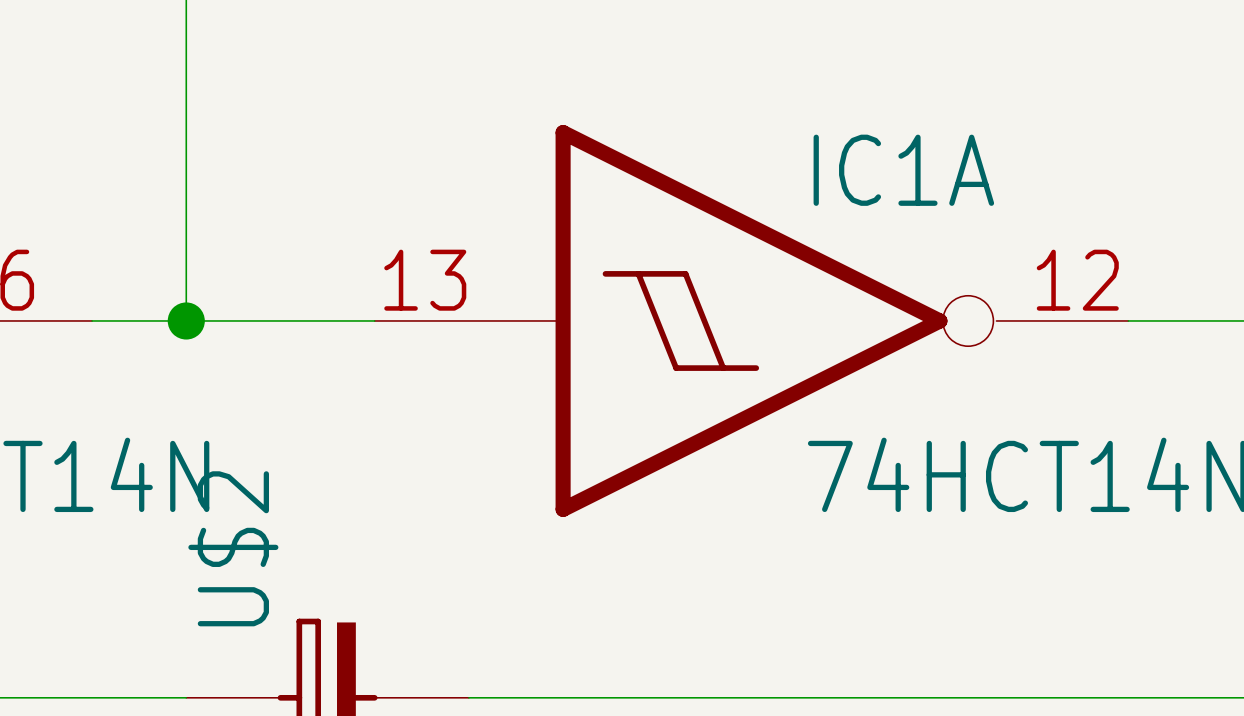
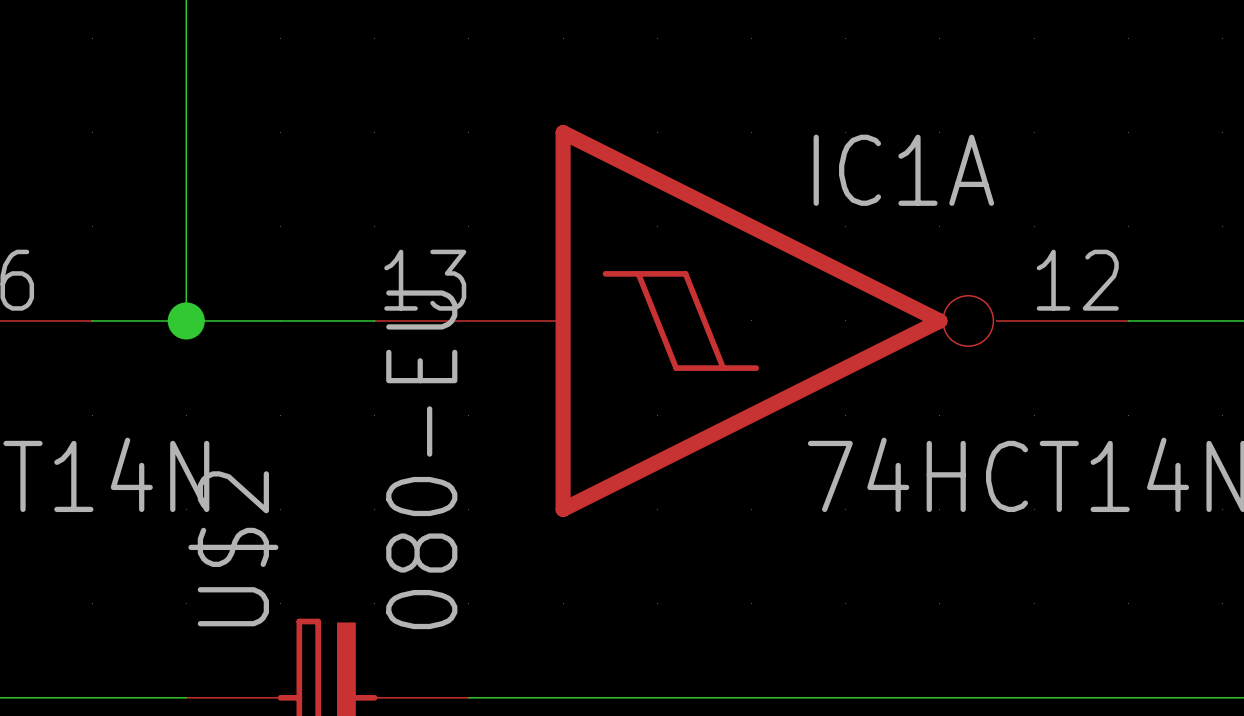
U$2 value: none -> 080-EU (421, 459)

